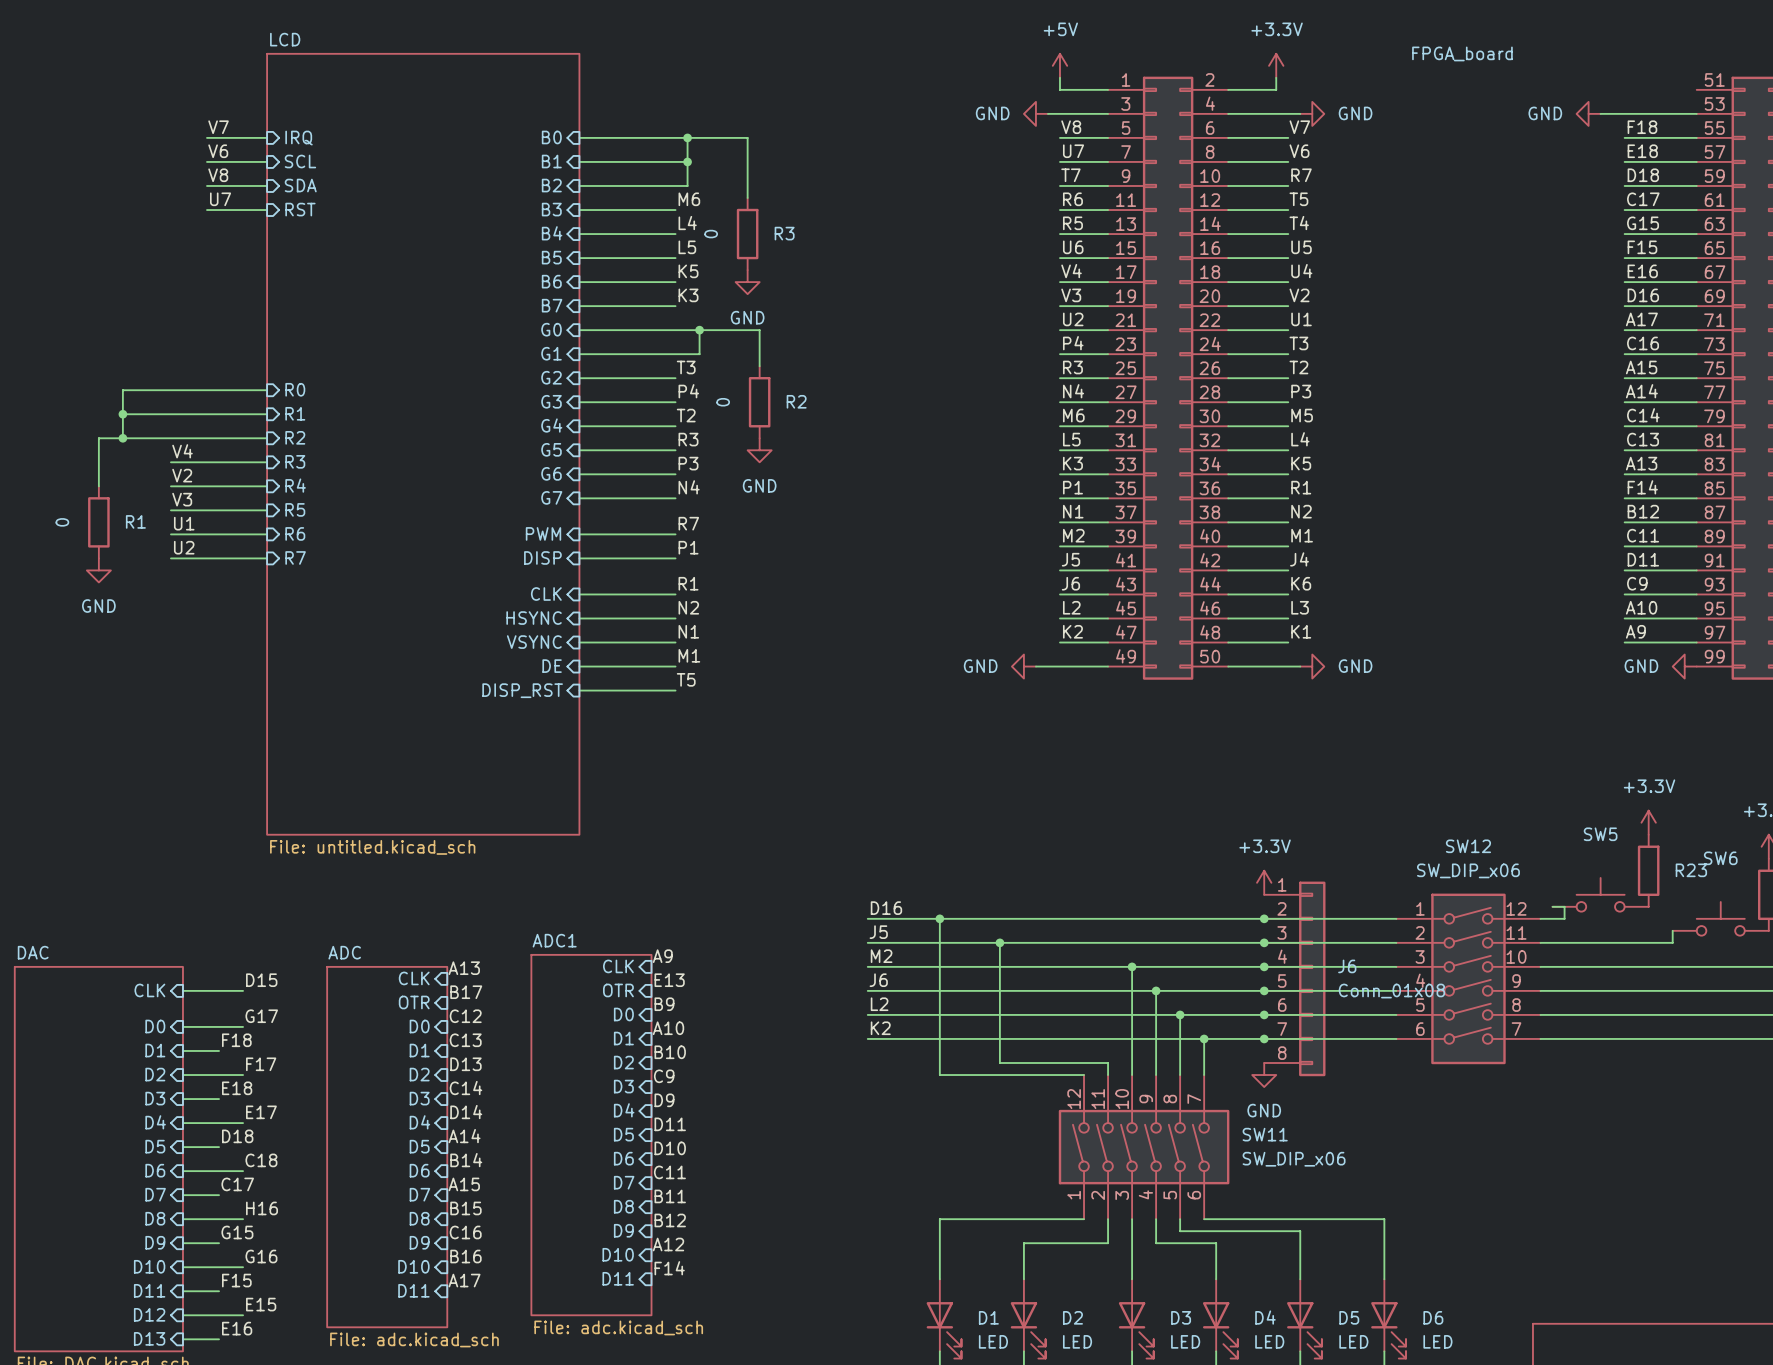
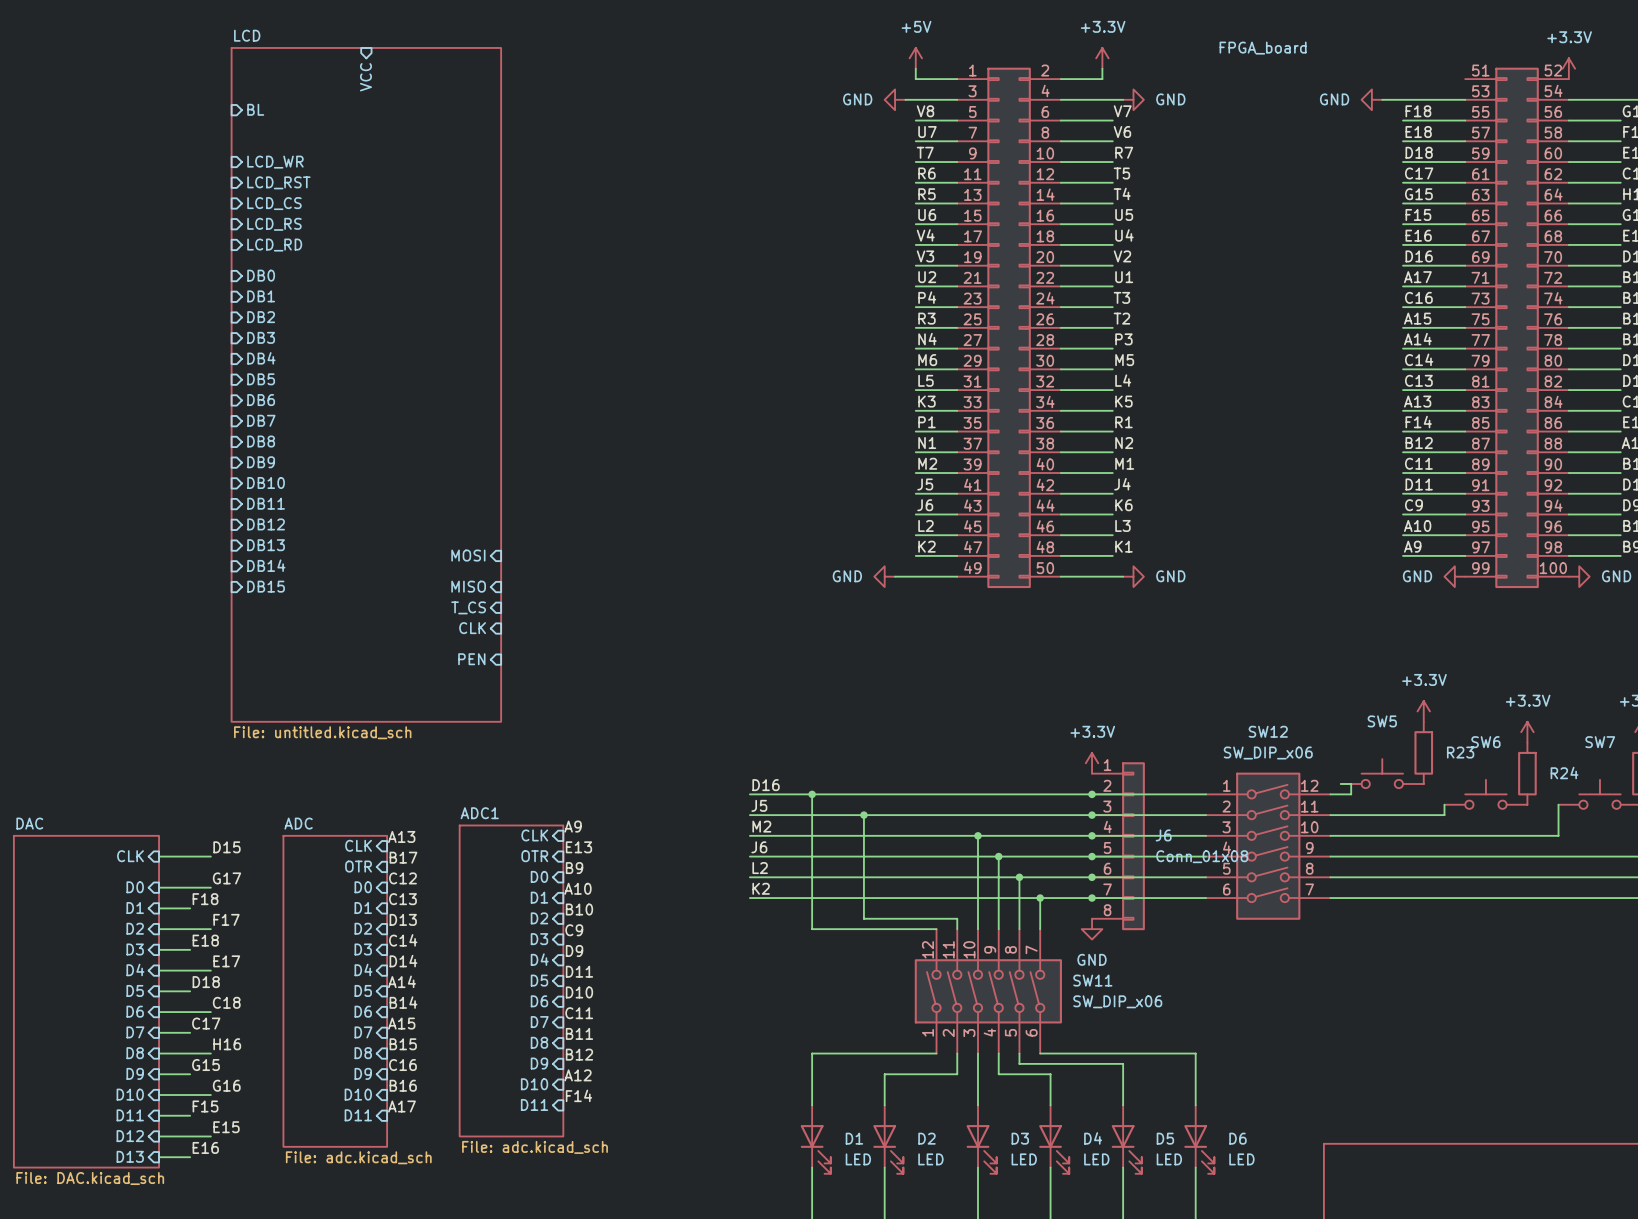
sheet pin: none -> VCC (365, 77)
sheet pin: none -> BL (255, 109)
label: V7 (218, 127) -> none
wire: (207, 137) (267, 137) -> none
sheet pin: B0 (551, 137) -> none
wire: (579, 137) (747, 137) (747, 198) -> none
wire: (687, 137) (687, 185) (579, 185) -> none
junction: (687, 137) -> none
sheet pin: IRQ (299, 138) -> none
label: V6 (218, 151) -> none
wire: (207, 161) (267, 161) -> none
sheet pin: SCL (300, 161) -> none
sheet pin: B1 (551, 161) -> none
wire: (579, 161) (687, 161) -> none
junction: (687, 161) -> none
label: V8 (218, 175) -> none
wire: (207, 185) (267, 185) -> none
sheet pin: SDA (300, 185) -> LCD_WR (275, 162)
sheet pin: B2 (551, 185) -> none
label: U7 (220, 199) -> none
label: M6 (689, 199) -> none
sheet pin: RST (300, 209) -> LCD_RST (278, 182)
sheet pin: B3 (551, 209) -> none
wire: (207, 210) (267, 210) -> none
wire: (579, 210) (675, 210) -> none
label: L4 (687, 223) -> none
sheet pin: B4 (552, 233) -> none
sheet pin: none -> LCD_CS (274, 203)
wire: (579, 234) (675, 234) -> none
R3: 0 (747, 234) -> none
label: L5 (687, 247) -> none
sheet pin: B5 (551, 257) -> none
sheet pin: none -> LCD_RS (274, 224)
wire: (579, 258) (675, 258) -> none
label: K5 (688, 271) -> none
sheet pin: B6 (551, 281) -> none
sheet pin: none -> LCD_RD (274, 245)
wire: (579, 282) (675, 282) -> none
power symbol: GND (747, 282) -> none
label: K3 (688, 295) -> none
sheet pin: B7 (552, 305) -> none
wire: (579, 306) (675, 306) -> none
sheet pin: none -> DB0 (261, 275)
sheet pin: G0 (551, 329) -> none
wire: (579, 330) (759, 330) (759, 366) -> none
wire: (699, 330) (699, 354) (579, 354) -> none
junction: (699, 330) -> none
sheet pin: none -> DB1 (261, 296)
sheet pin: G1 (551, 353) -> none
sheet pin: none -> DB2 (261, 317)
label: T3 (686, 367) -> none
sheet pin: G2 (551, 377) -> none
wire: (579, 378) (675, 378) -> none
sheet pin: R0 (295, 389) -> DB3 (261, 337)
wire: (267, 390) (122, 390) (122, 438) -> none
label: P4 (688, 391) -> none
sheet pin: G3 (551, 401) -> none
wire: (579, 402) (675, 402) -> none
R2: 0 (759, 402) -> none
sheet pin: R1 (295, 413) -> DB4 (261, 358)
wire: (122, 414) (267, 414) -> none
junction: (122, 414) -> none
label: T2 (686, 415) -> none
sheet pin: G4 (551, 425) -> none
wire: (579, 426) (675, 426) -> none
sheet pin: R2 (295, 437) -> DB5 (261, 379)
junction: (122, 438) -> none
wire: (267, 438) (98, 438) (98, 486) -> none
label: R3 (688, 439) -> none
sheet pin: G5 (551, 449) -> none
wire: (579, 450) (675, 450) -> none
power symbol: GND (759, 450) -> none
label: V4 (182, 451) -> none
sheet pin: R3 (295, 461) -> DB6 (261, 400)
wire: (170, 462) (267, 462) -> none
label: P3 (688, 463) -> none
sheet pin: G6 (551, 473) -> none
wire: (579, 474) (675, 474) -> none
label: V2 (182, 475) -> none
sheet pin: R4 (295, 485) -> DB7 (261, 420)
wire: (170, 486) (267, 486) -> none
label: N4 (689, 487) -> none
sheet pin: G7 (551, 497) -> none
wire: (579, 498) (675, 498) -> none
label: V3 (182, 499) -> none
sheet pin: R5 (295, 509) -> DB8 (261, 441)
wire: (170, 510) (267, 510) -> none
R1: 0 (98, 522) -> none
label: U1 (184, 523) -> none
label: R7 (688, 523) -> none
sheet pin: R6 (295, 533) -> DB9 (261, 462)
sheet pin: PWM (543, 533) -> none
wire: (170, 534) (267, 534) -> none
wire: (579, 534) (675, 534) -> none
label: U2 (184, 547) -> none
label: P1 (688, 547) -> none
sheet pin: R7 (295, 557) -> DB10 (266, 482)
sheet pin: DISP (542, 557) -> none
wire: (170, 558) (267, 558) -> none
wire: (579, 558) (675, 558) -> none
power symbol: GND (98, 570) -> none
sheet pin: none -> DB11 (266, 503)
label: R1 (688, 583) -> none
sheet pin position: CLK (546, 594) -> CLK (472, 628)
wire: (579, 594) (675, 594) -> none
sheet pin: none -> DB12 (266, 524)
label: N2 (688, 607) -> none
sheet pin: HSYNC (534, 618) -> none
wire: (579, 618) (675, 618) -> none
sheet pin: none -> DB13 (266, 545)
label: N1 (688, 631) -> none
sheet pin: VSYNC (534, 642) -> MOSI (468, 555)
wire: (579, 642) (675, 642) -> none
sheet pin: none -> DB14 (266, 565)
label: M1 (689, 655) -> none
sheet pin: DE (552, 666) -> none
wire: (579, 666) (675, 666) -> none
sheet pin: none -> DB15 (266, 586)
sheet pin: none -> MISO (468, 586)
label: T5 (686, 679) -> none
sheet pin: DISP_RST (522, 690) -> none
wire: (579, 690) (675, 690) -> none
sheet pin: none -> T_CS (468, 607)
sheet pin: none -> PEN (471, 659)

